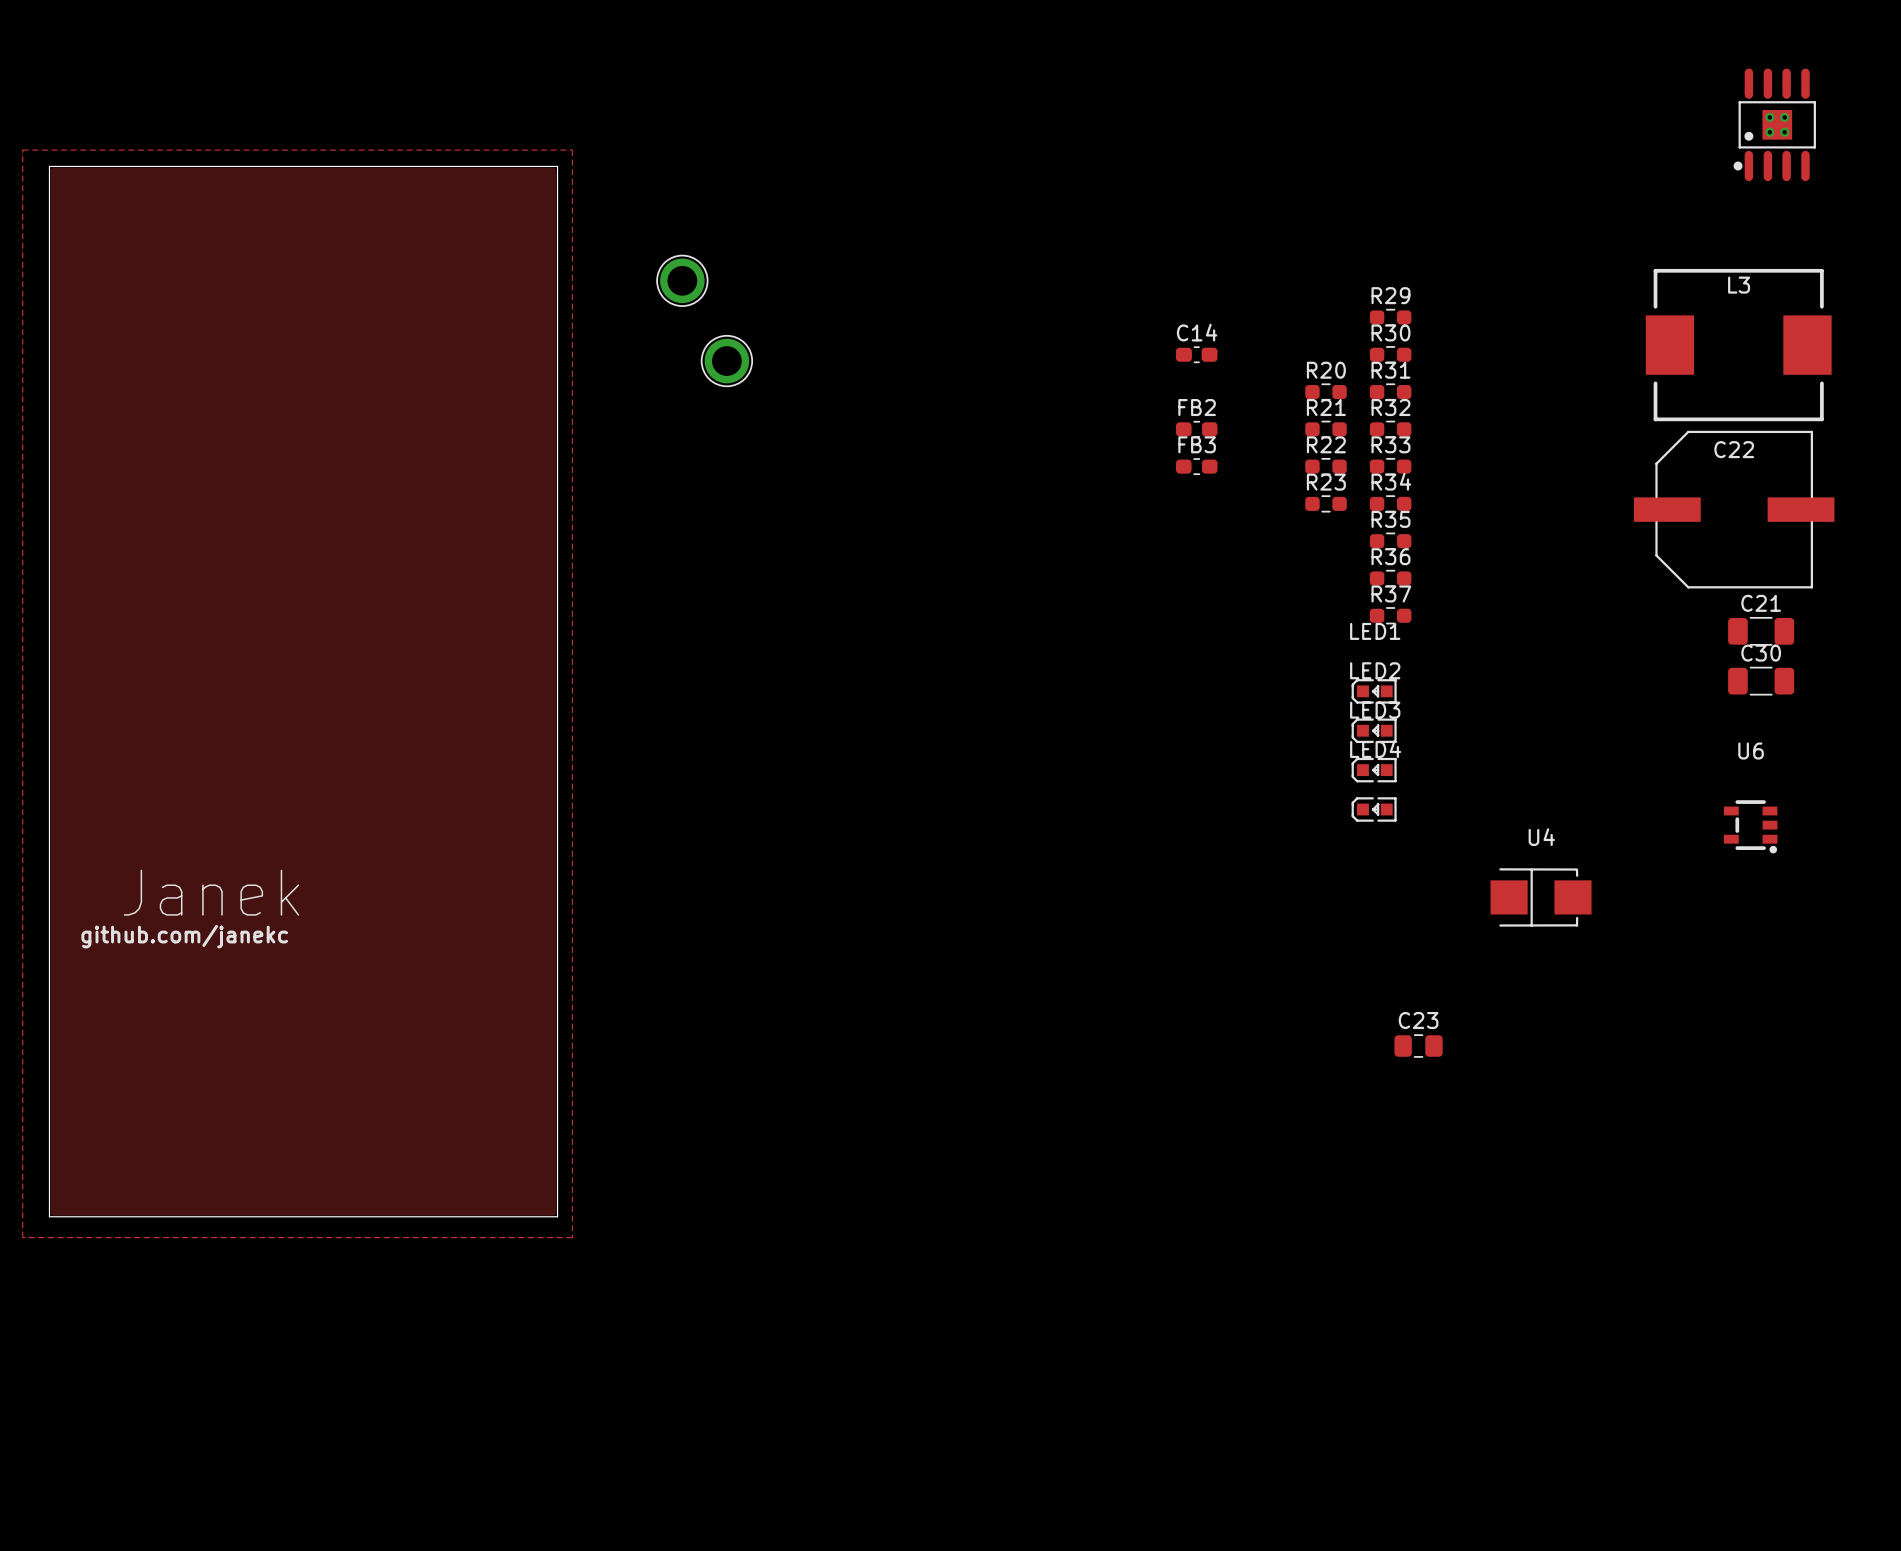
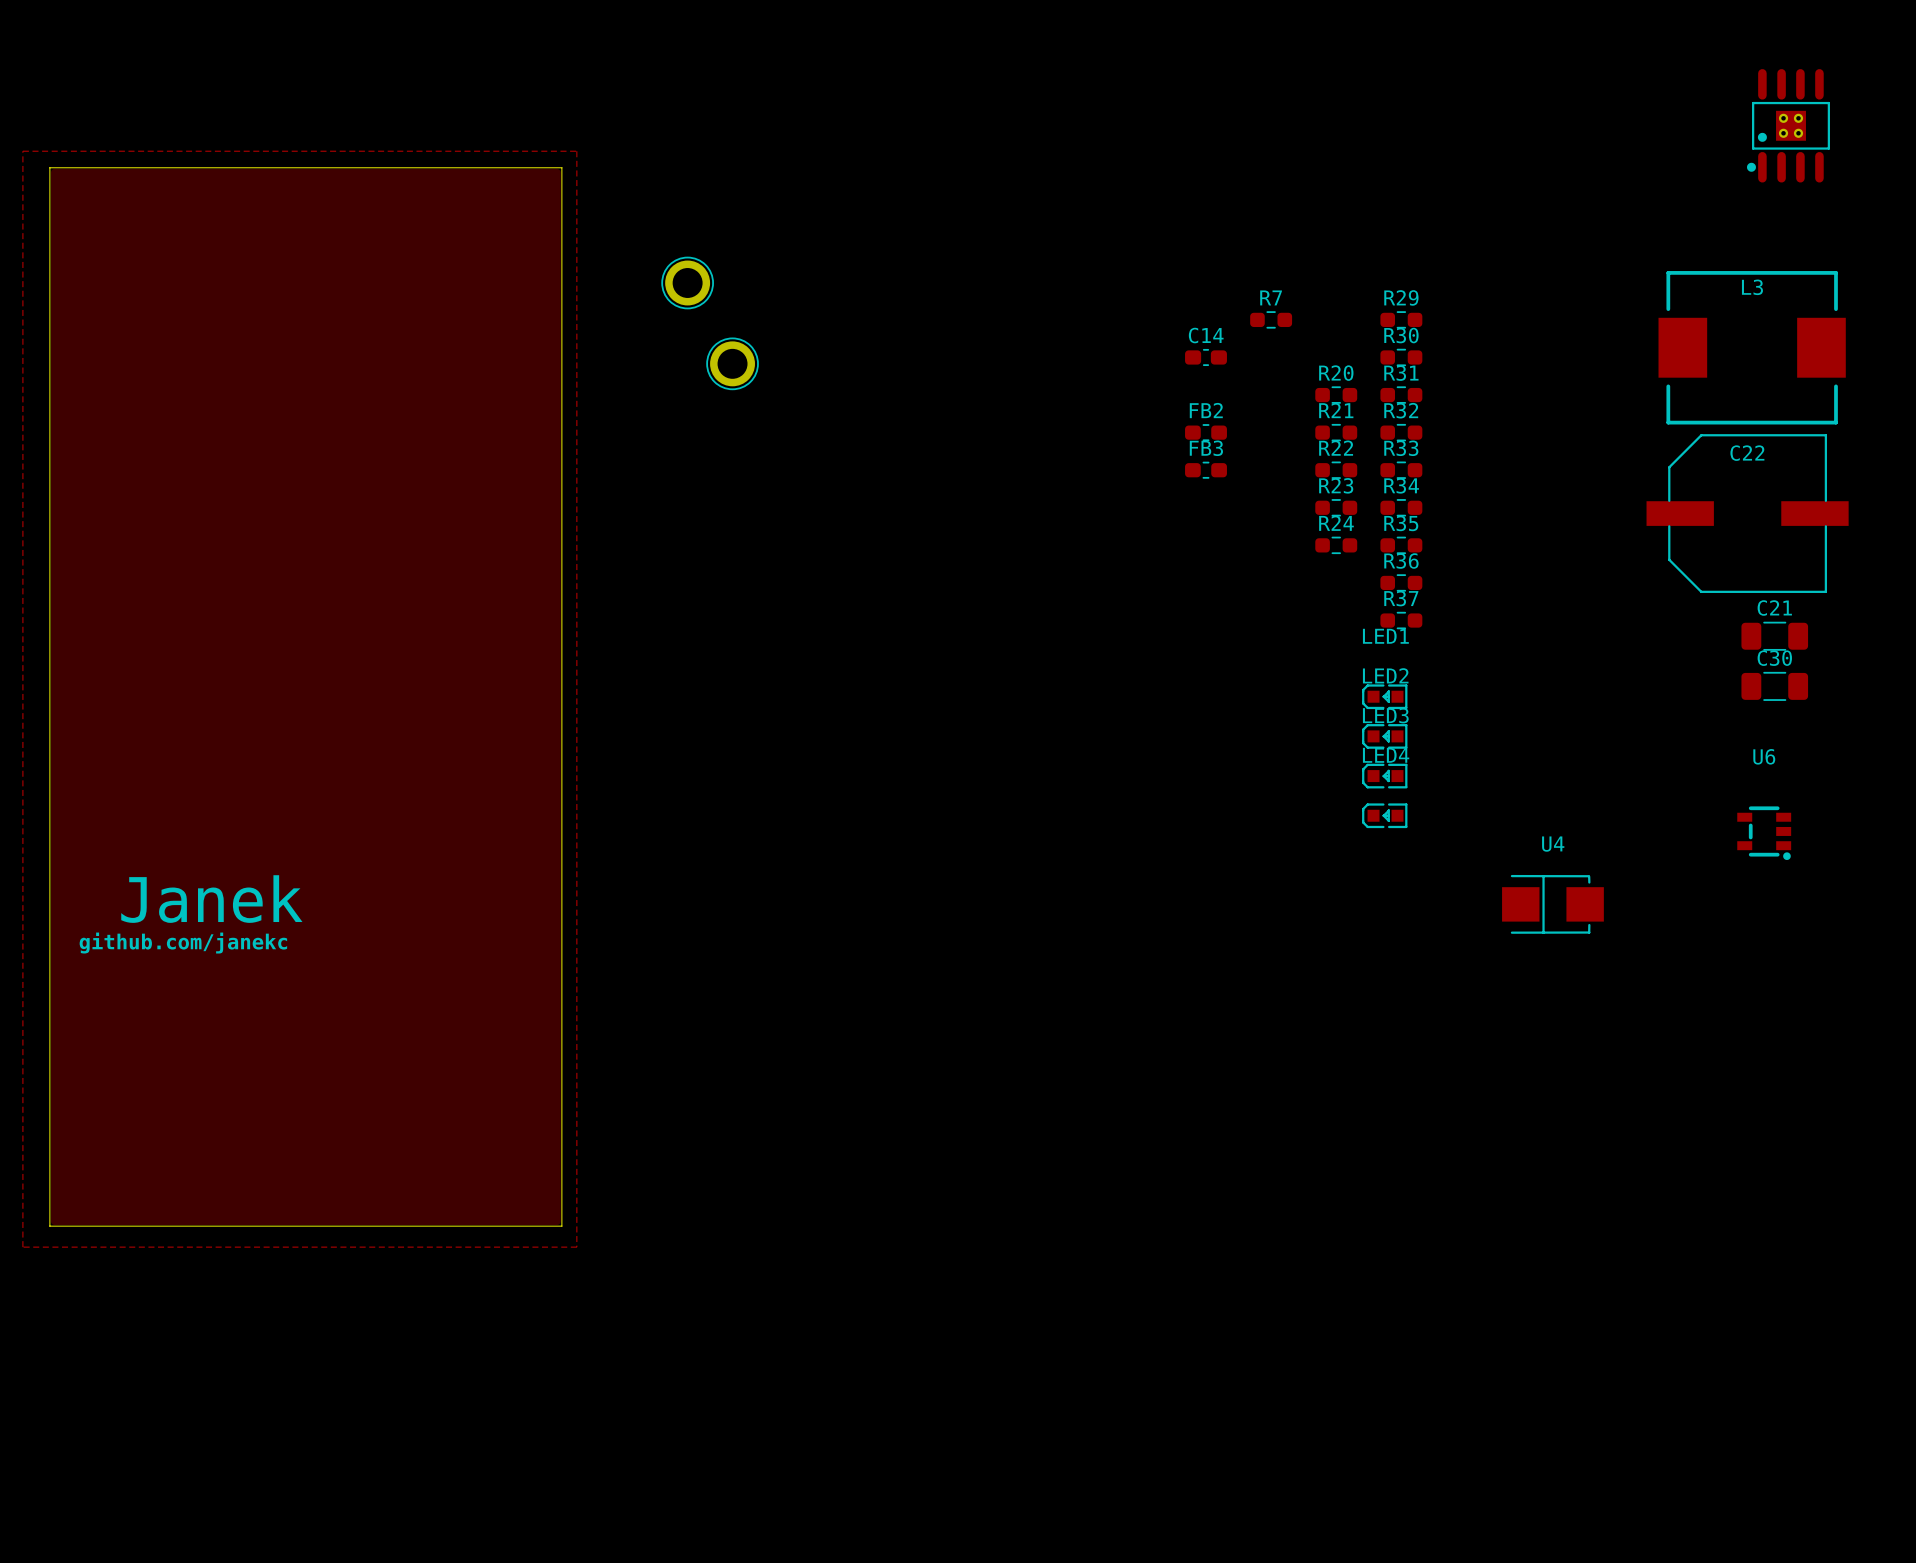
R7: none -> (1271, 319)
R24: none -> (1336, 545)
C23: (1418, 1046) -> none

